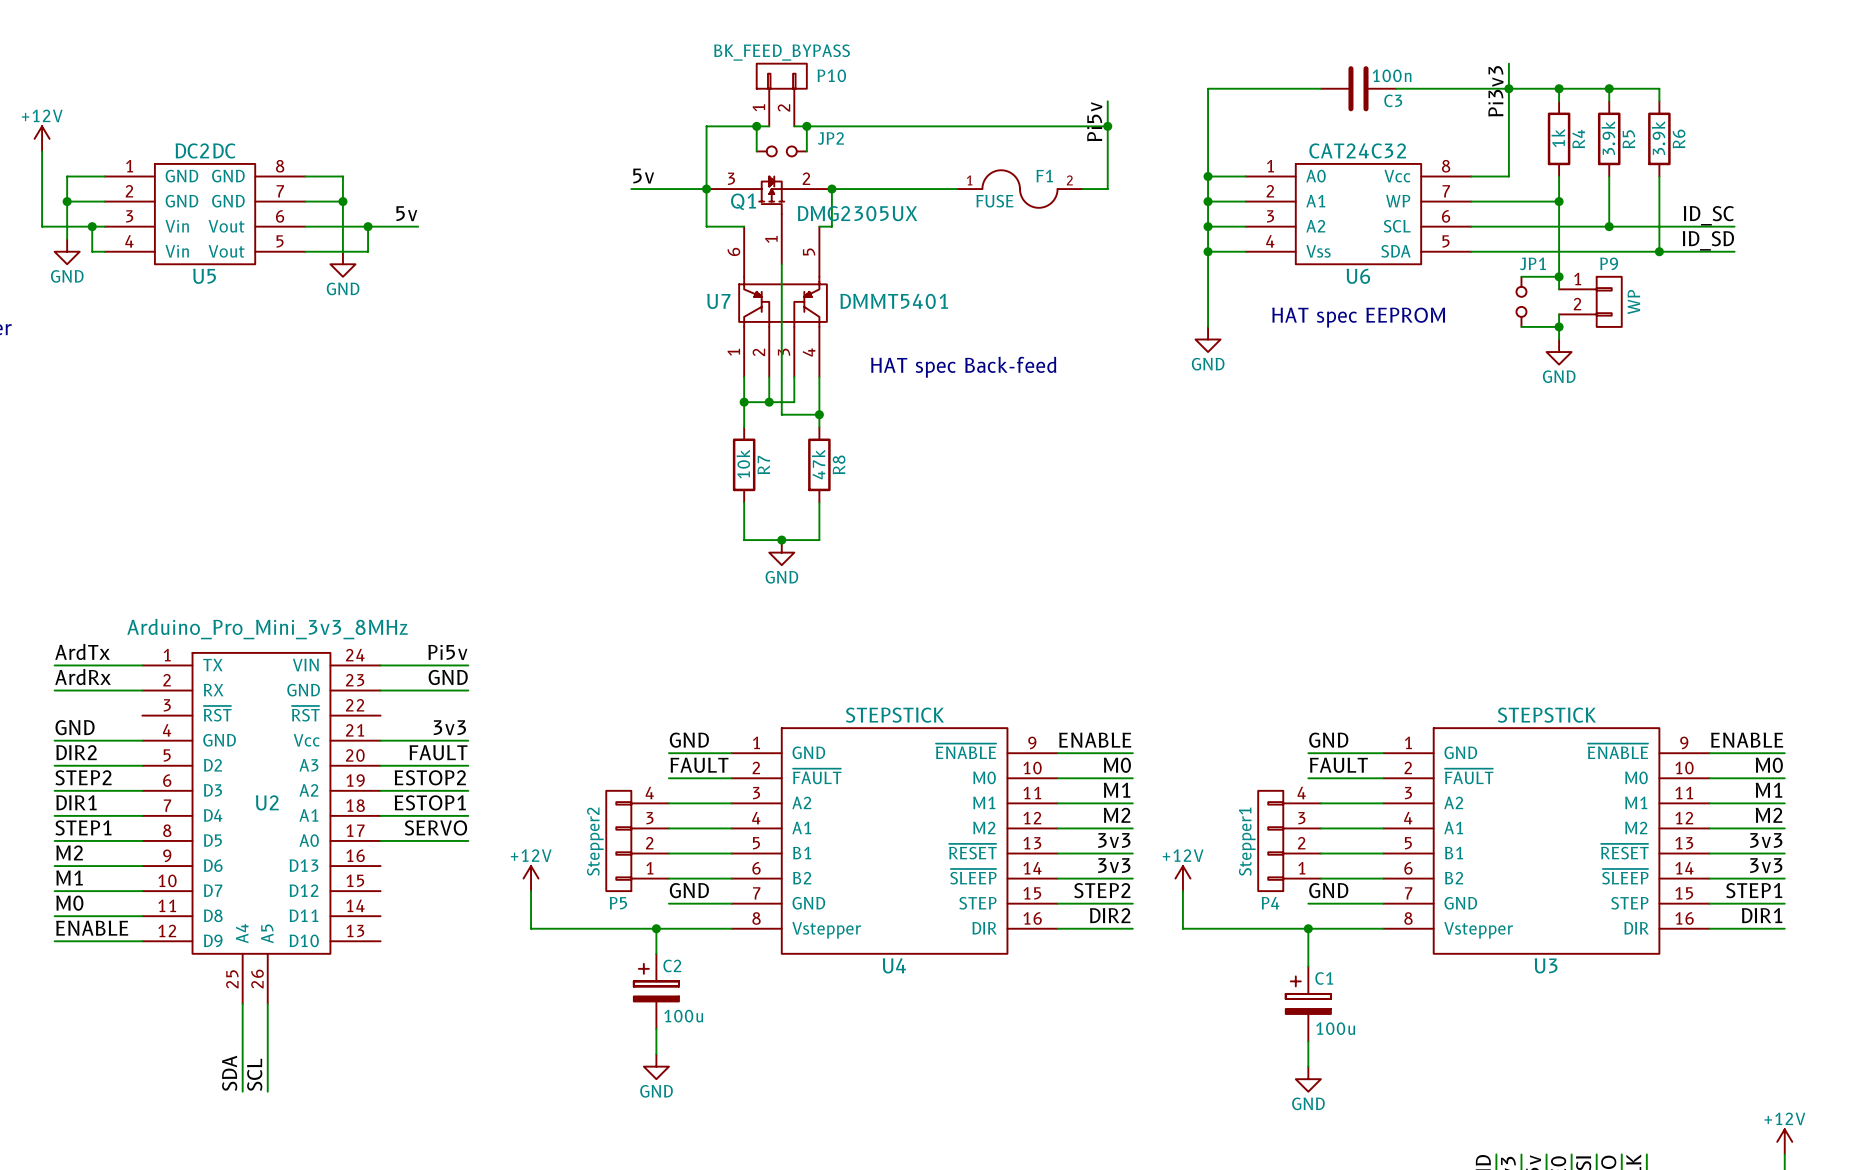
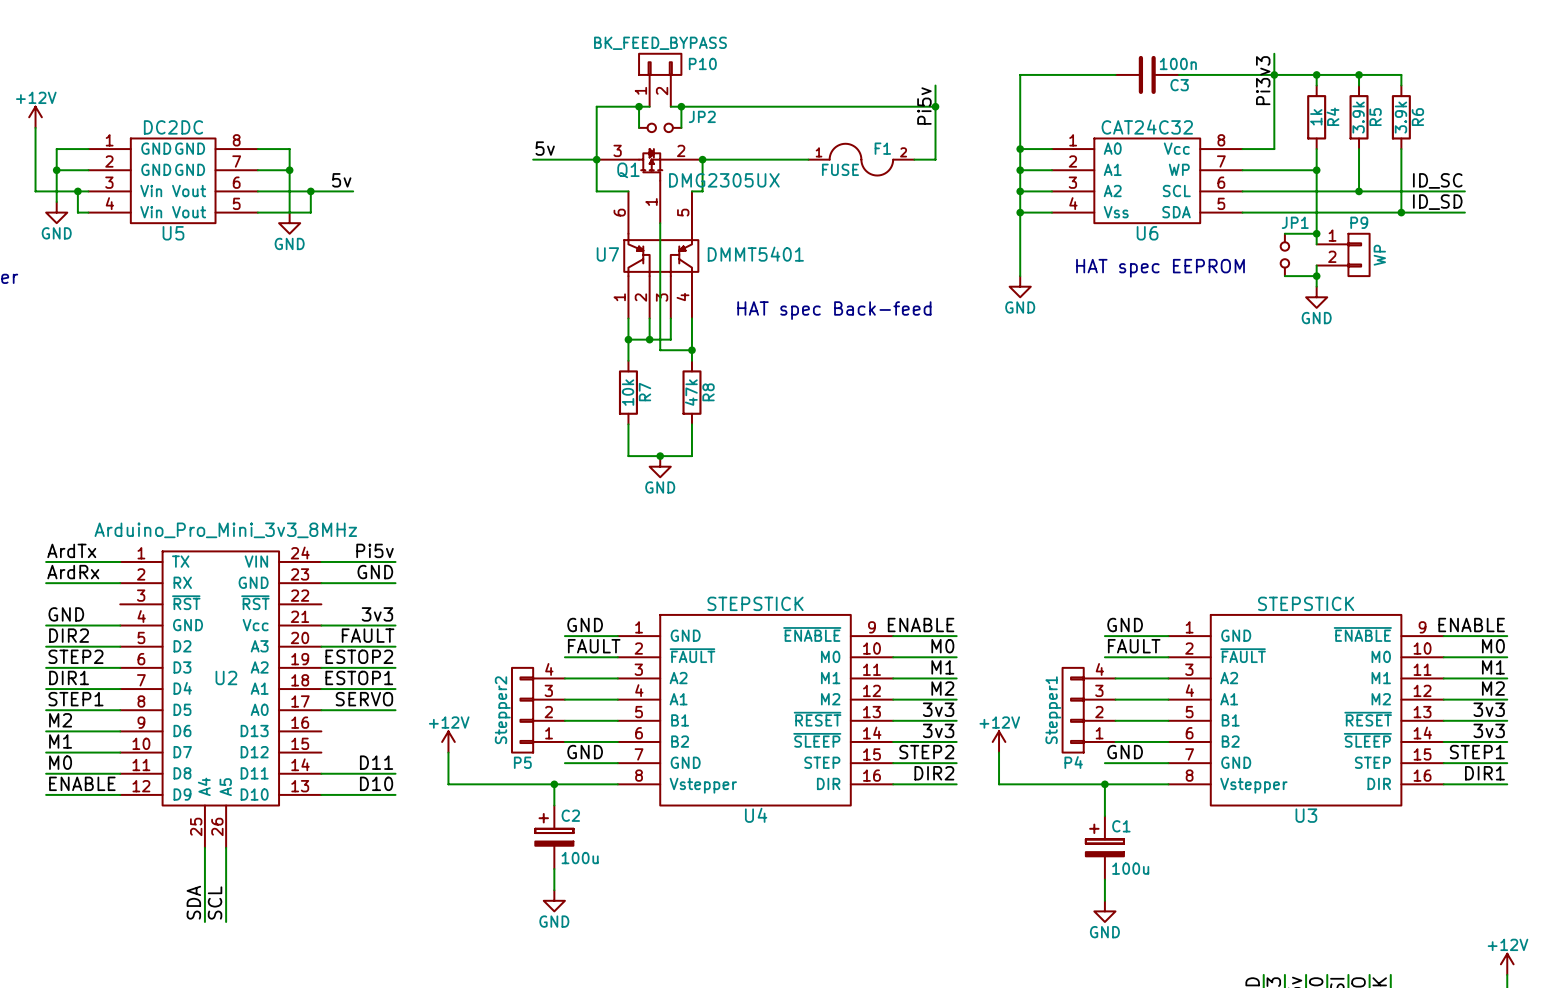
label: none -> D11 (376, 762)
wire: none -> (321, 773) (395, 773)
label: none -> D10 (376, 783)
wire: none -> (321, 794) (395, 794)

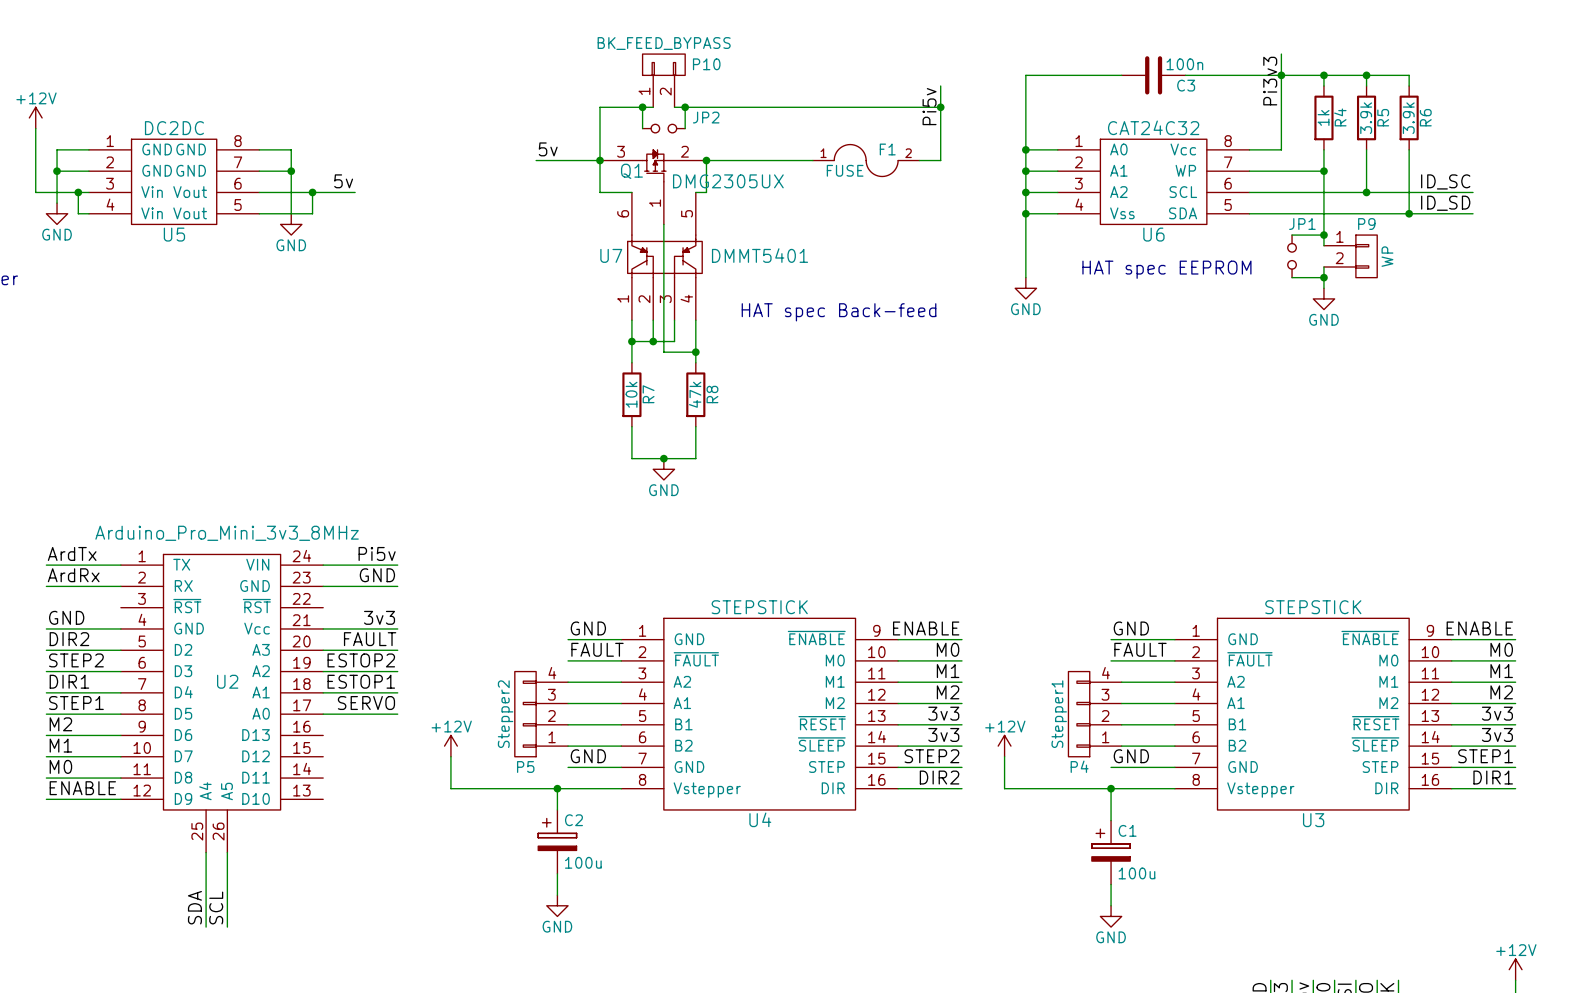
label: D11 (376, 762) -> none
wire: (321, 773) (395, 773) -> none
label: D10 (376, 783) -> none
wire: (321, 794) (395, 794) -> none

